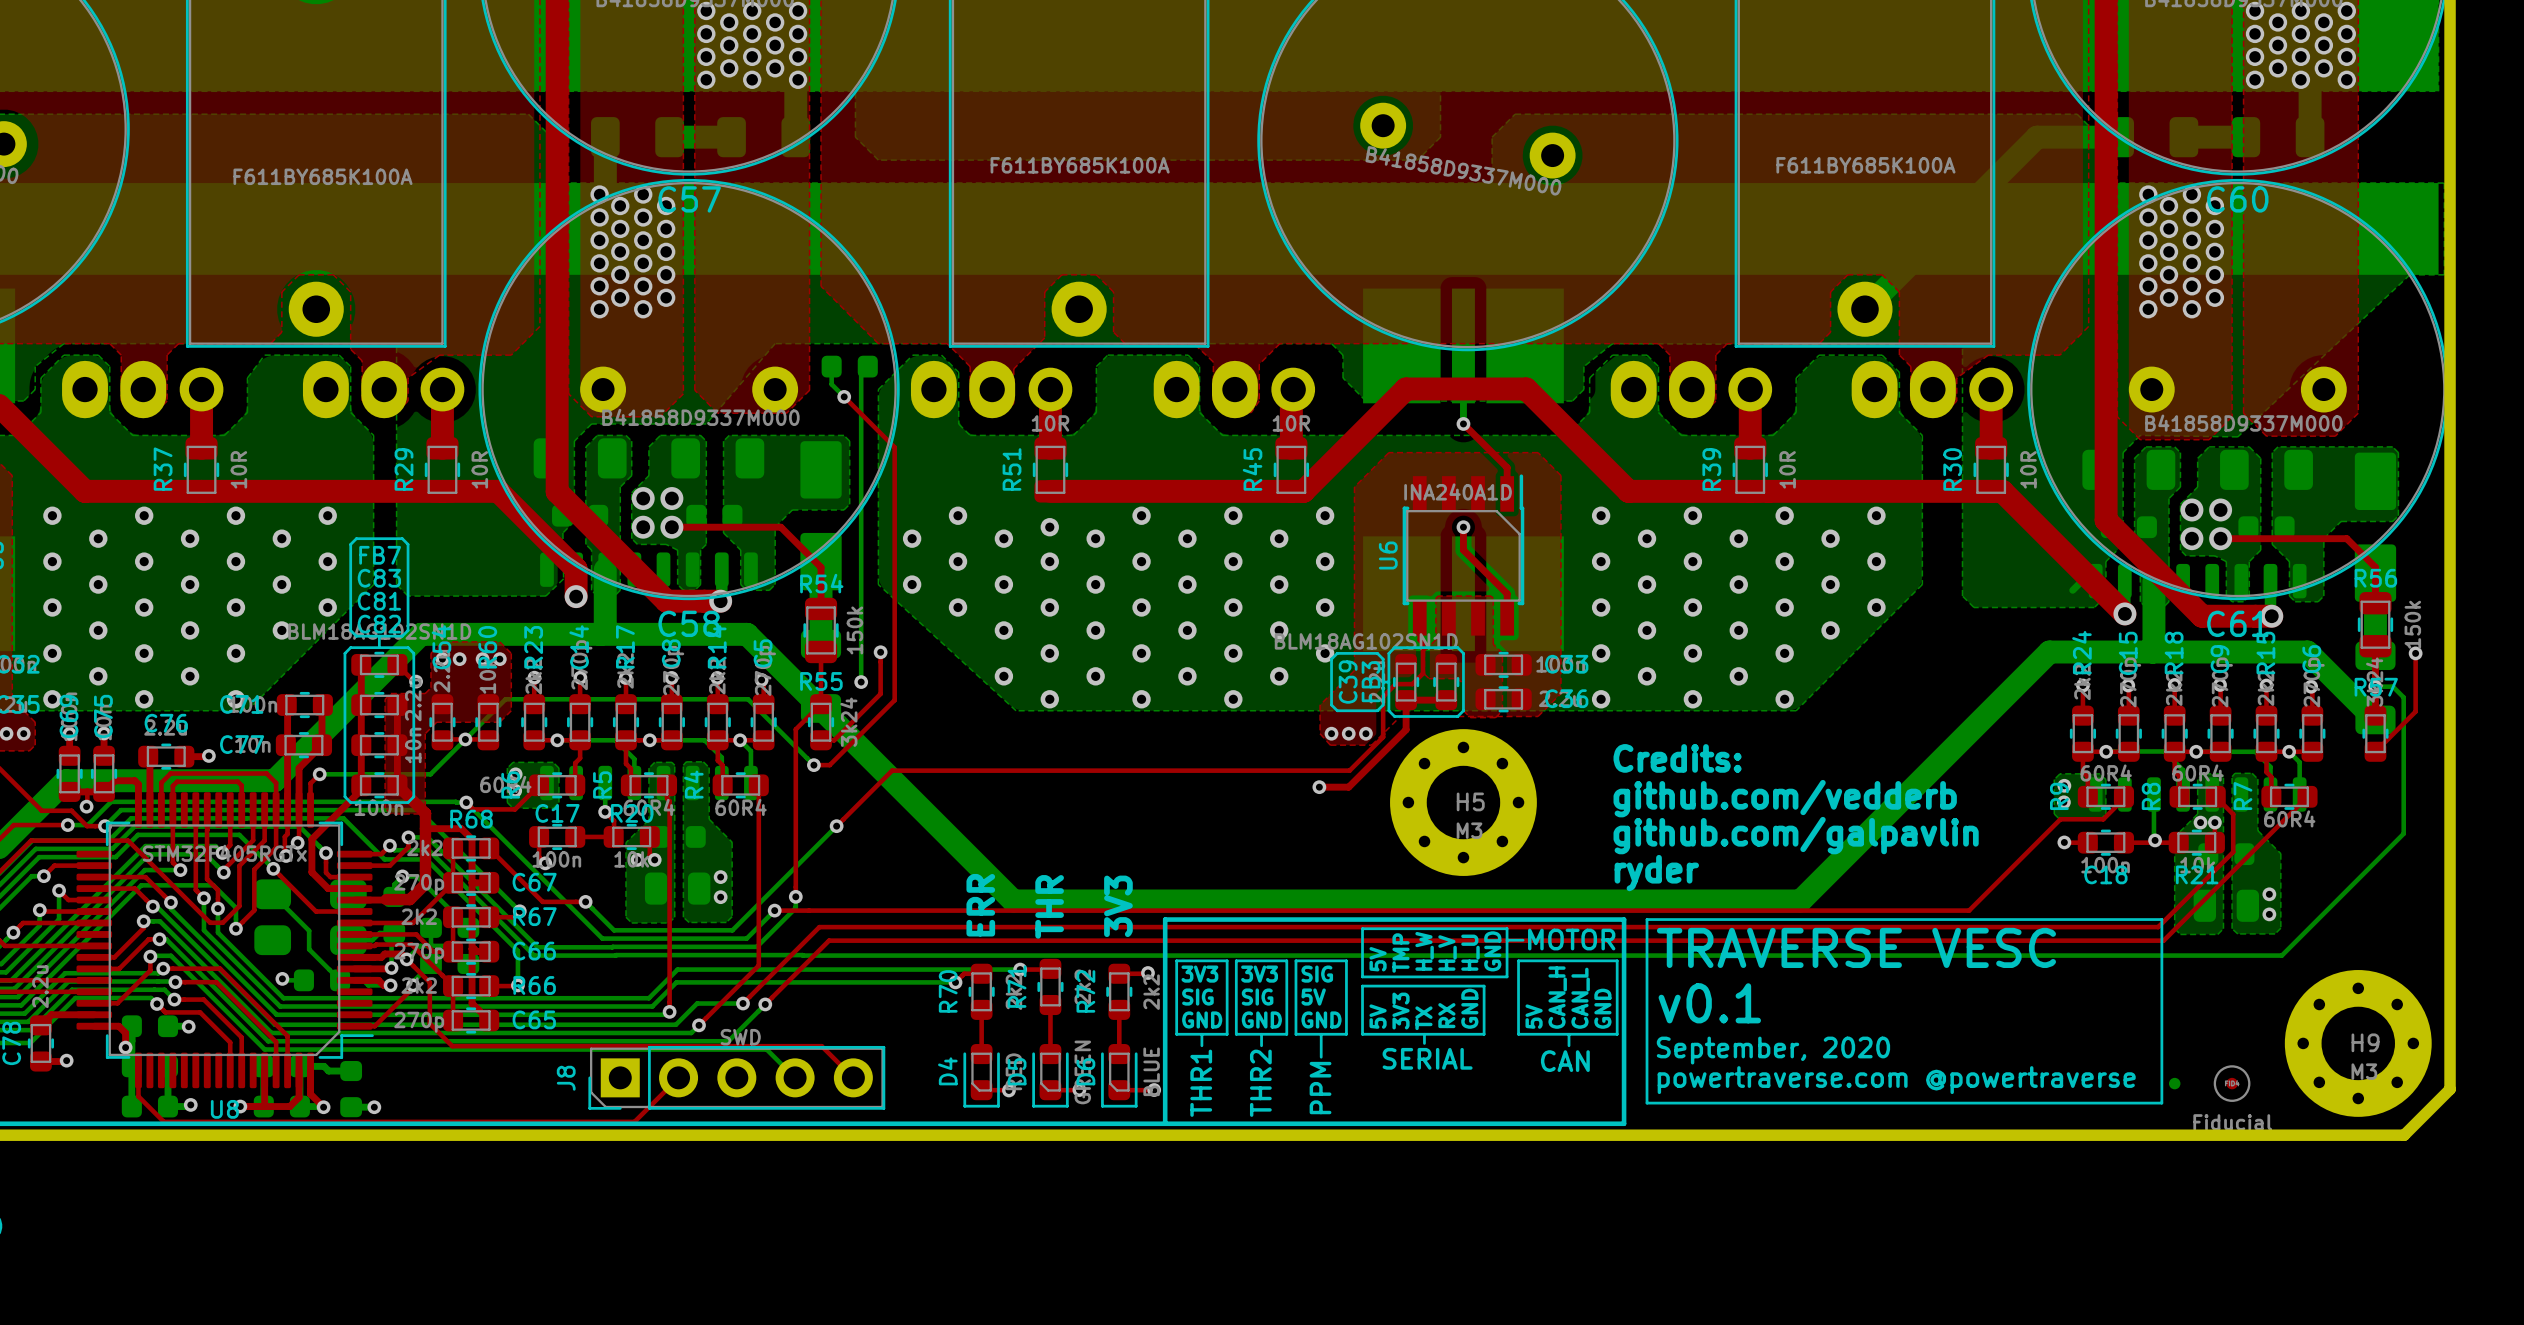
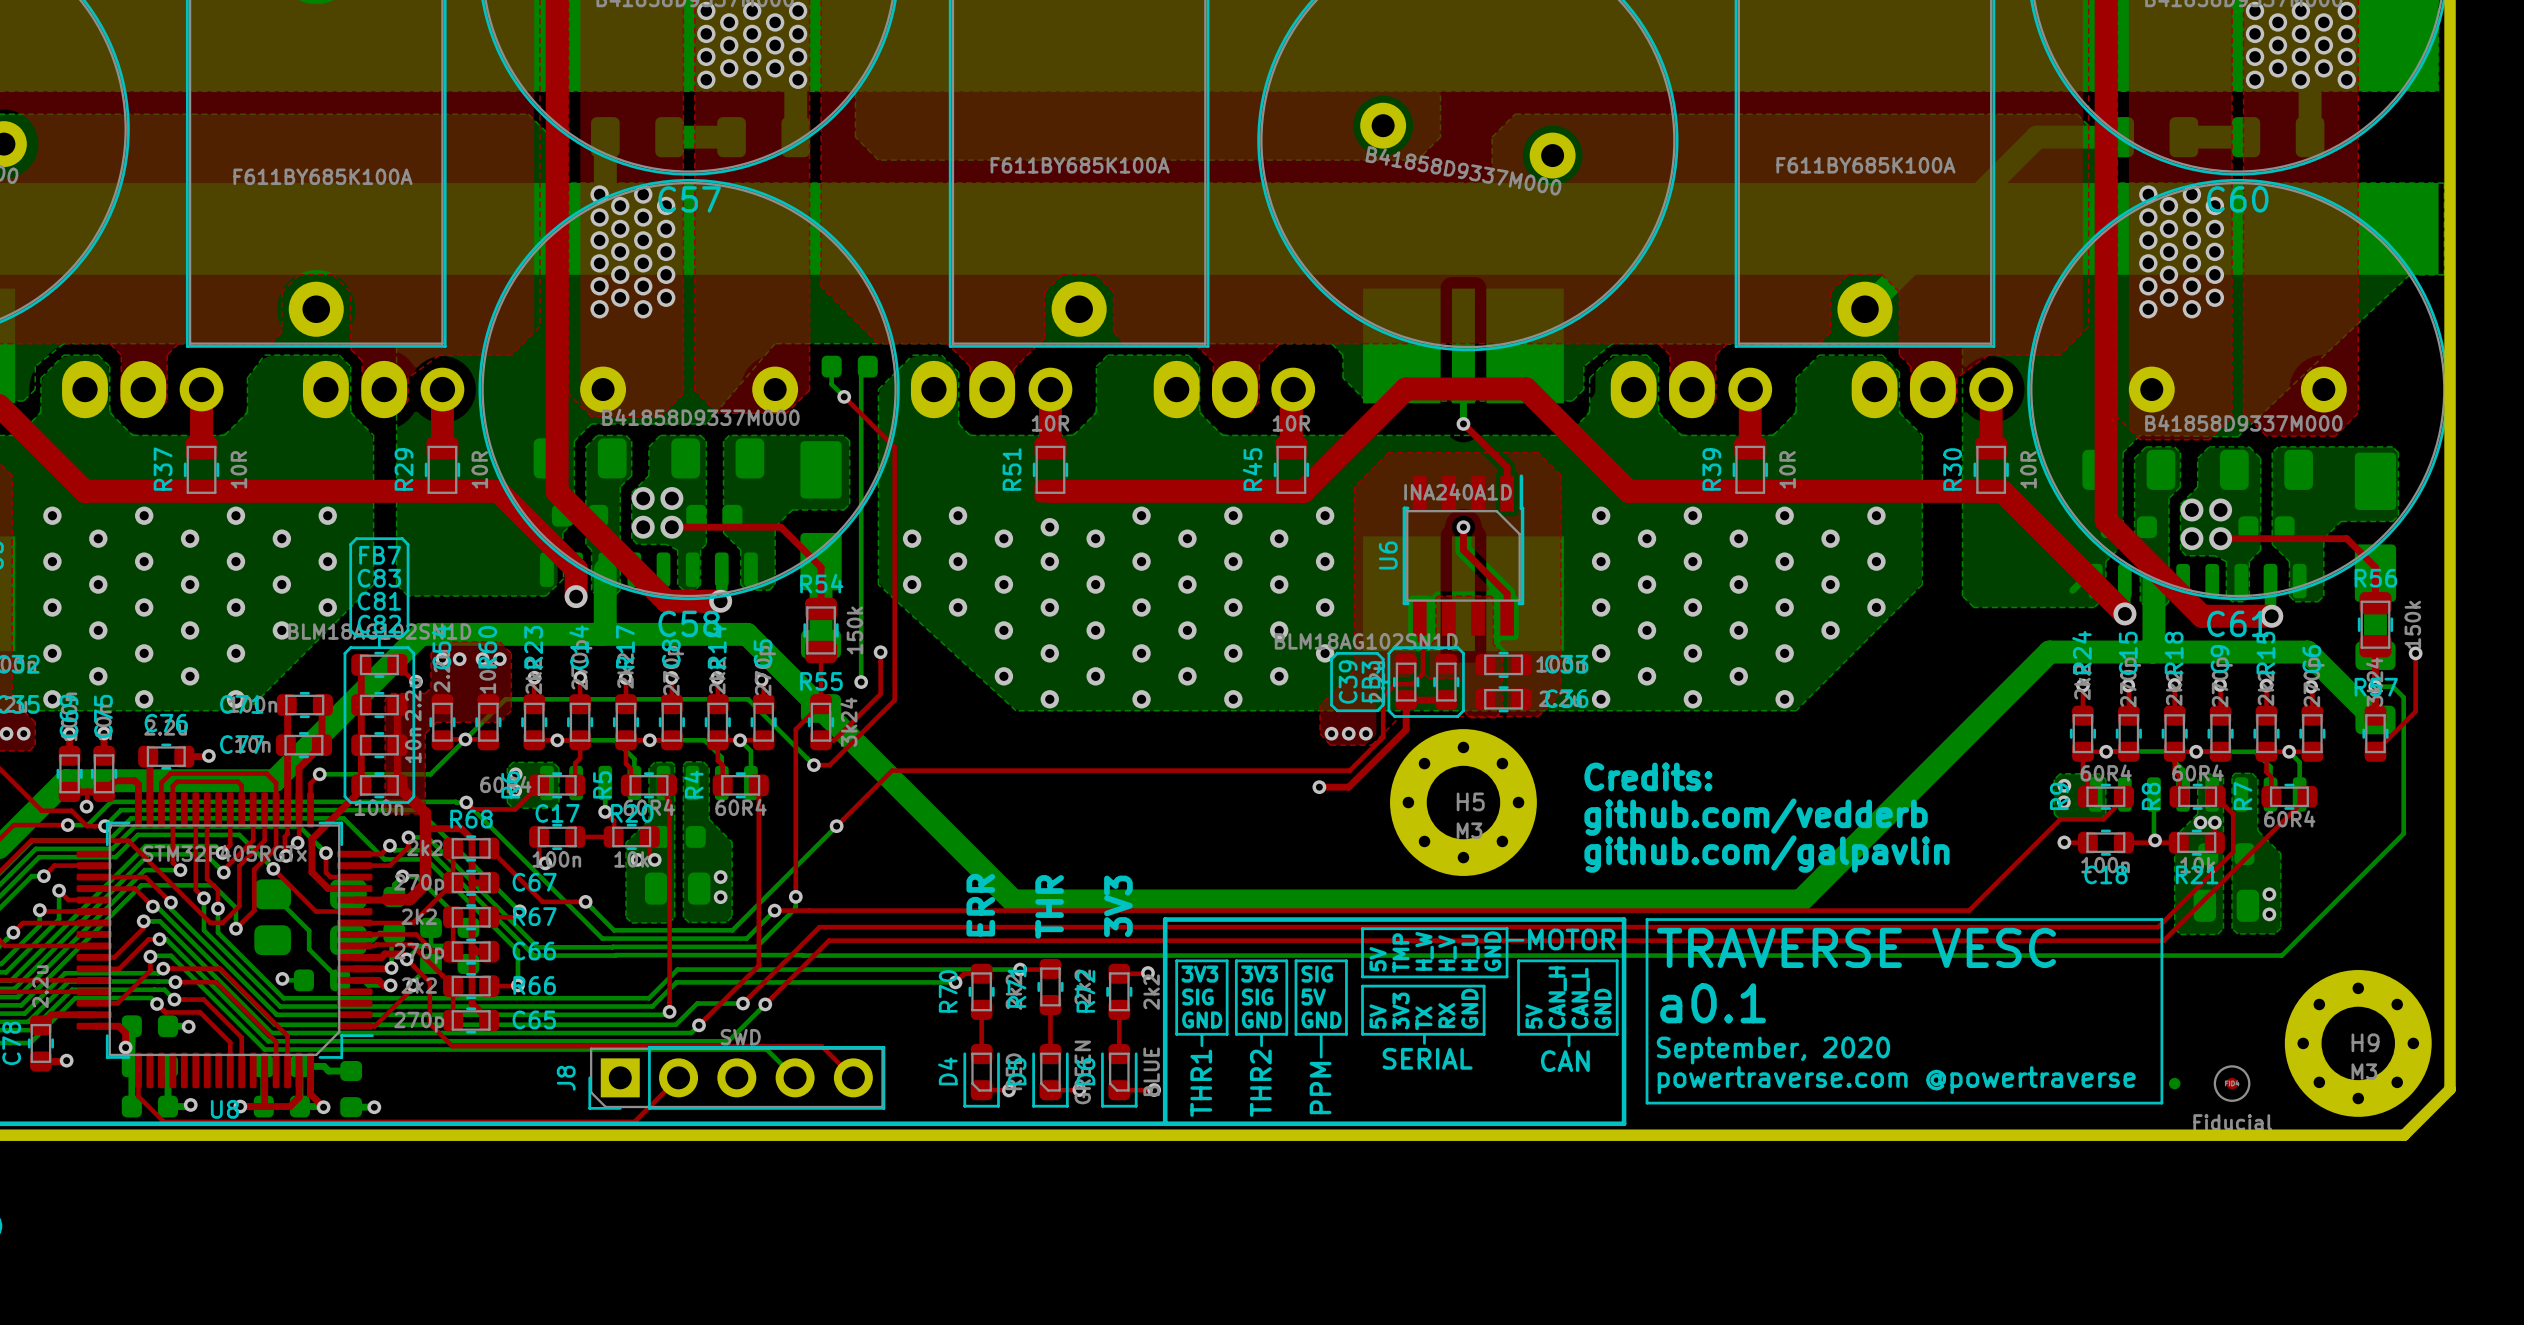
text position: Credits: (1677, 758) -> Credits: (1648, 776)
text position: github.com/vedderb (1785, 798) -> github.com/vedderb (1756, 817)
text position: github.com/galpavlin (1796, 835) -> github.com/galpavlin (1766, 854)
text: ryder (1656, 873) -> none
text: v0.1 (1709, 1003) -> a0.1 (1713, 1003)

